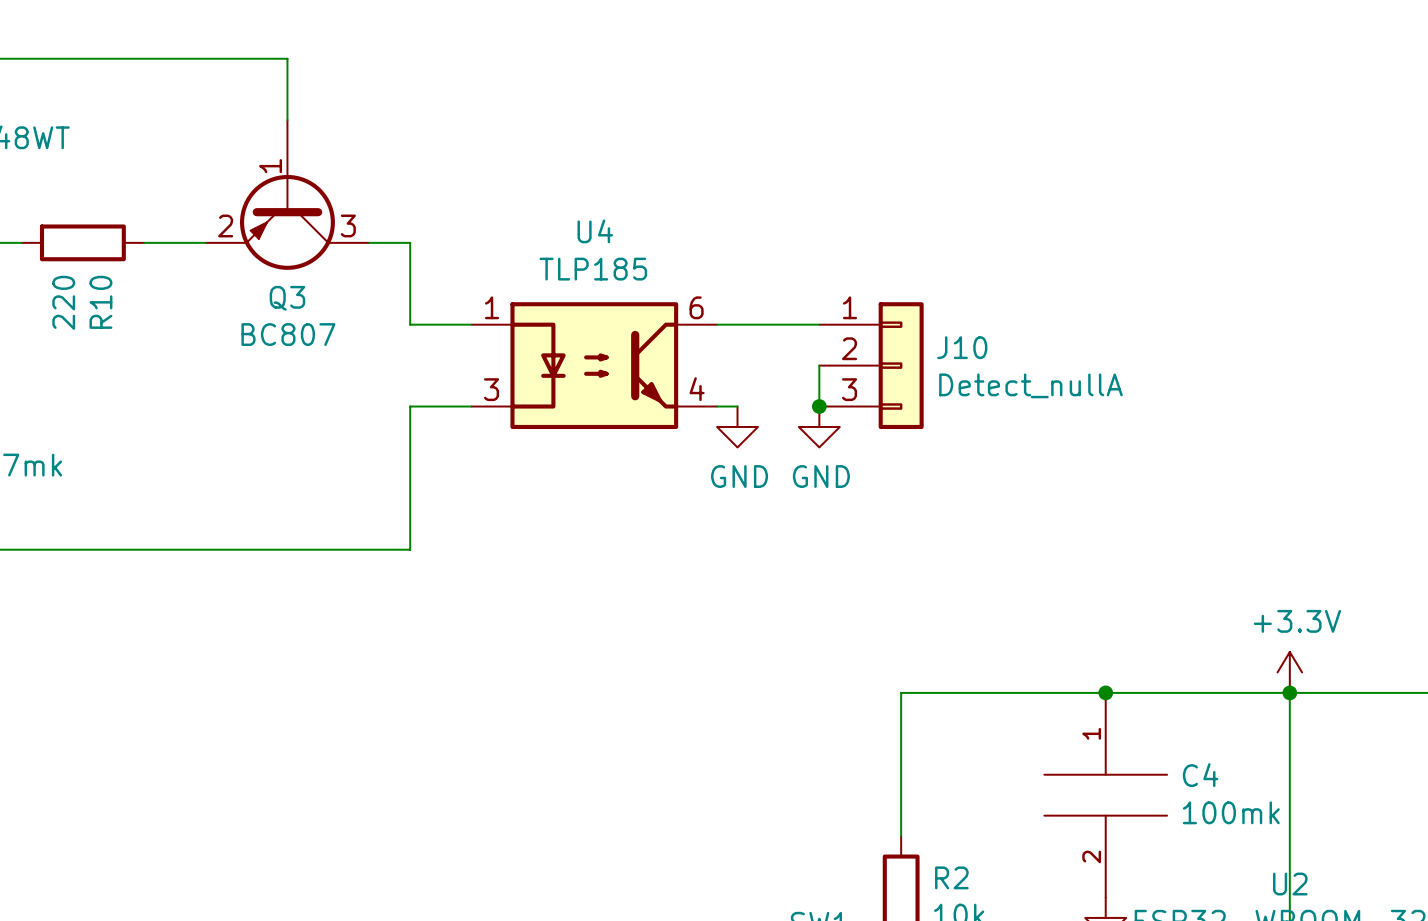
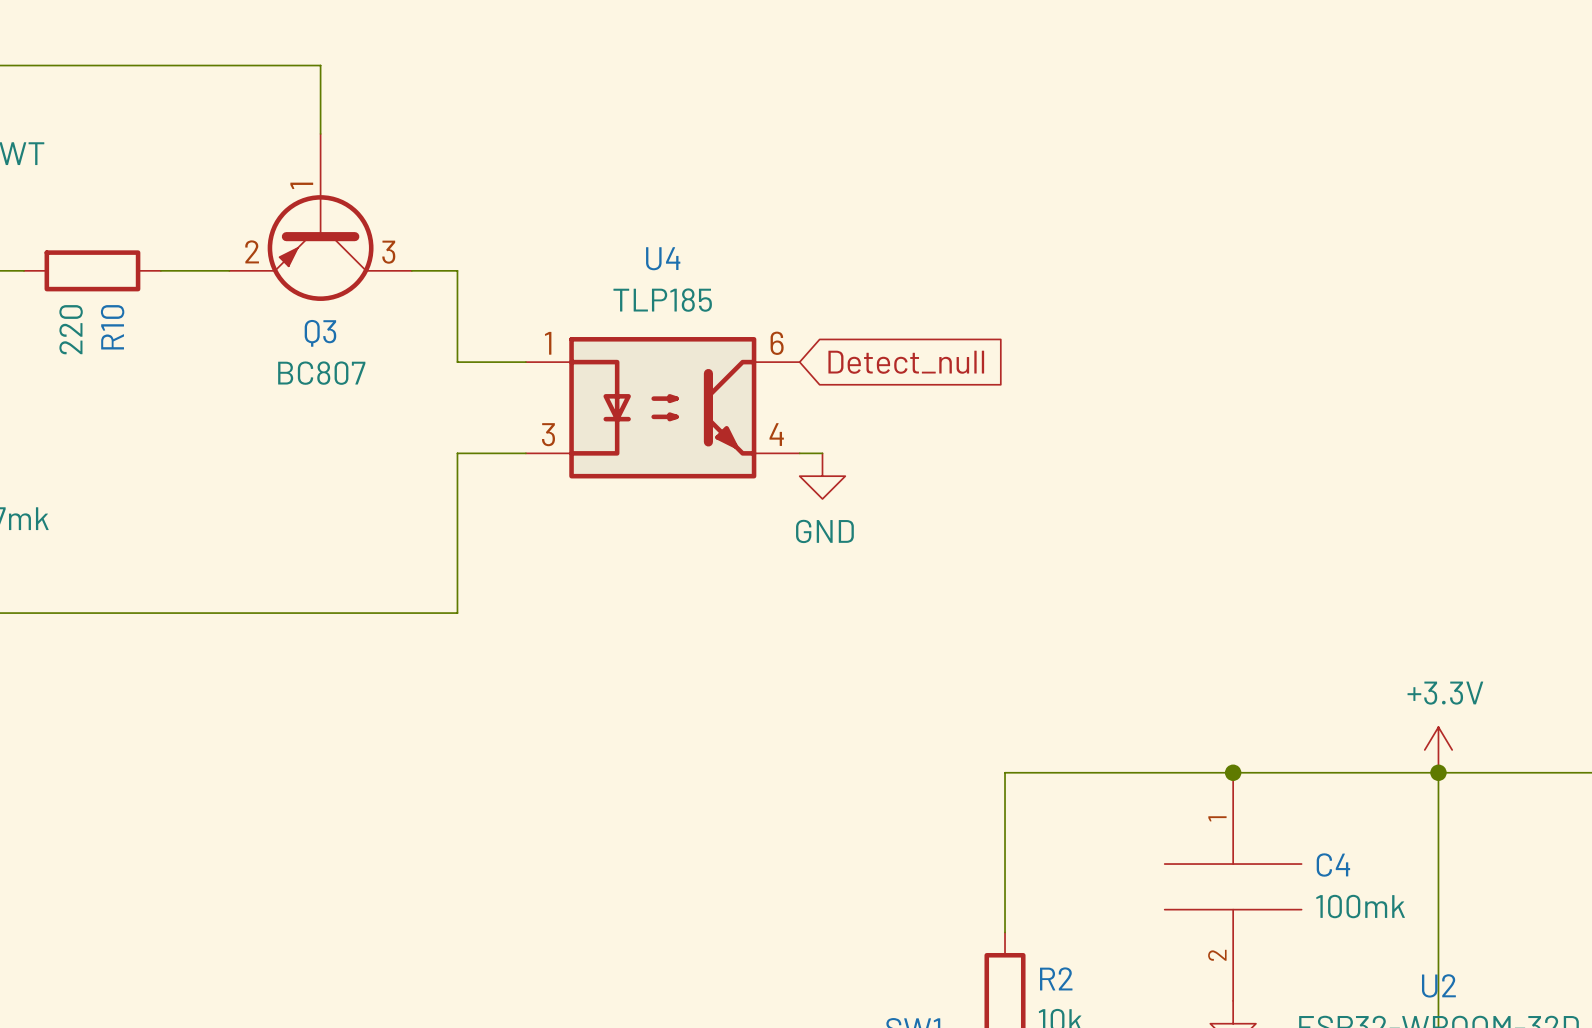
wire: (717, 324) (819, 324) -> none
global label: none -> Detect_null (906, 362)
wire: (819, 365) (819, 406) -> none
J10: Detect_nullA (871, 365) -> none
junction: (819, 406) -> none
power symbol: GND (819, 426) -> none

